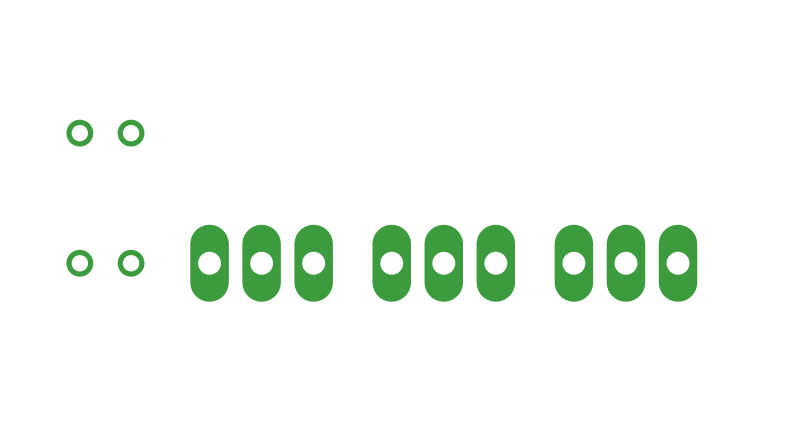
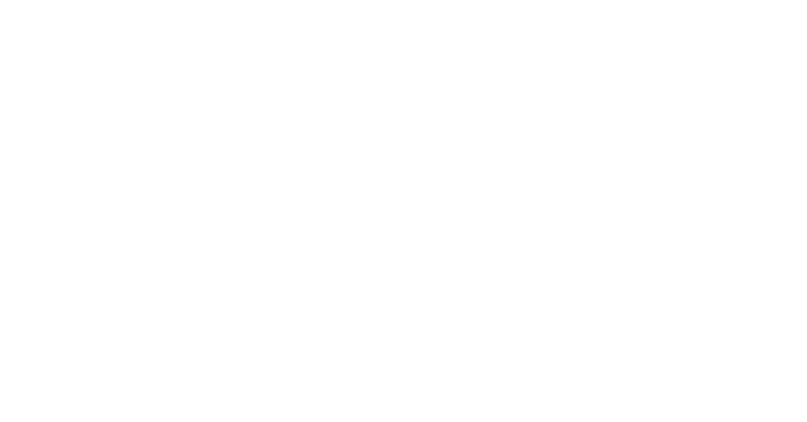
part: (105, 133) -> none
part: (105, 263) -> none
part: (261, 263) -> none
part: (443, 263) -> none
part: (625, 263) -> none

